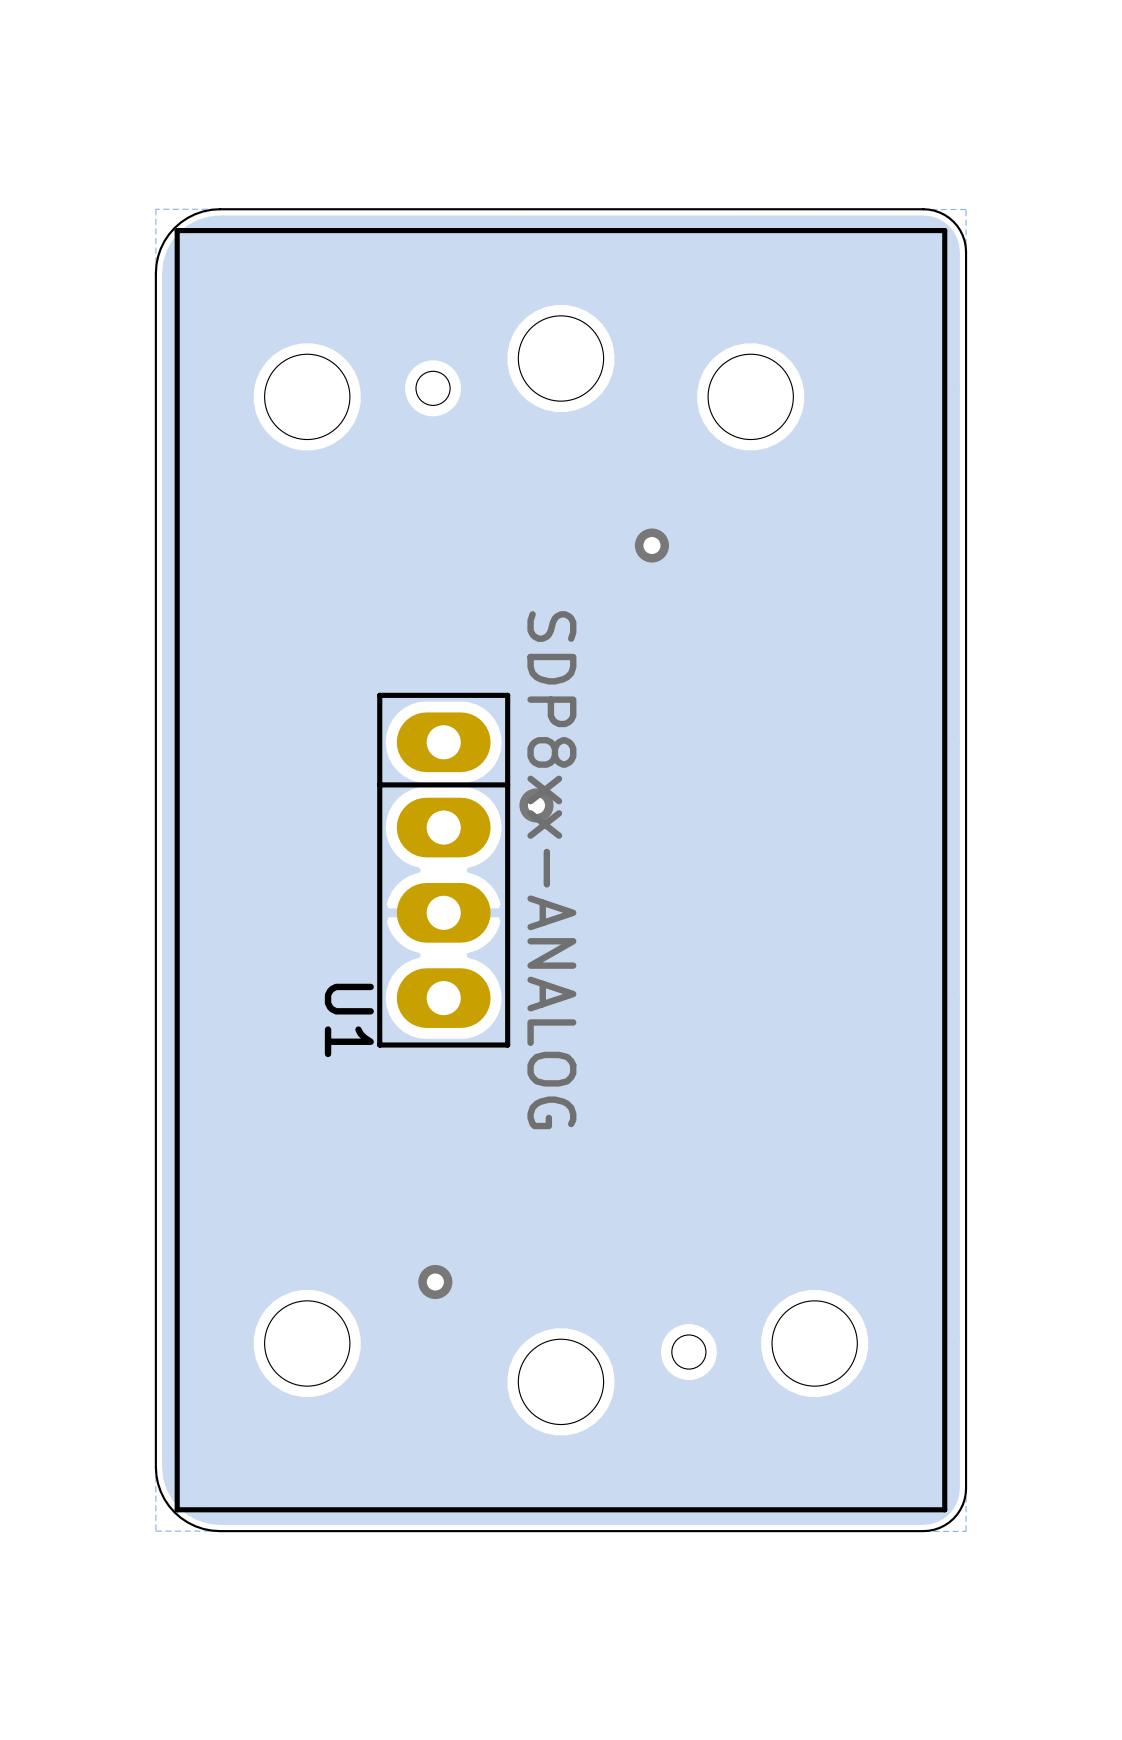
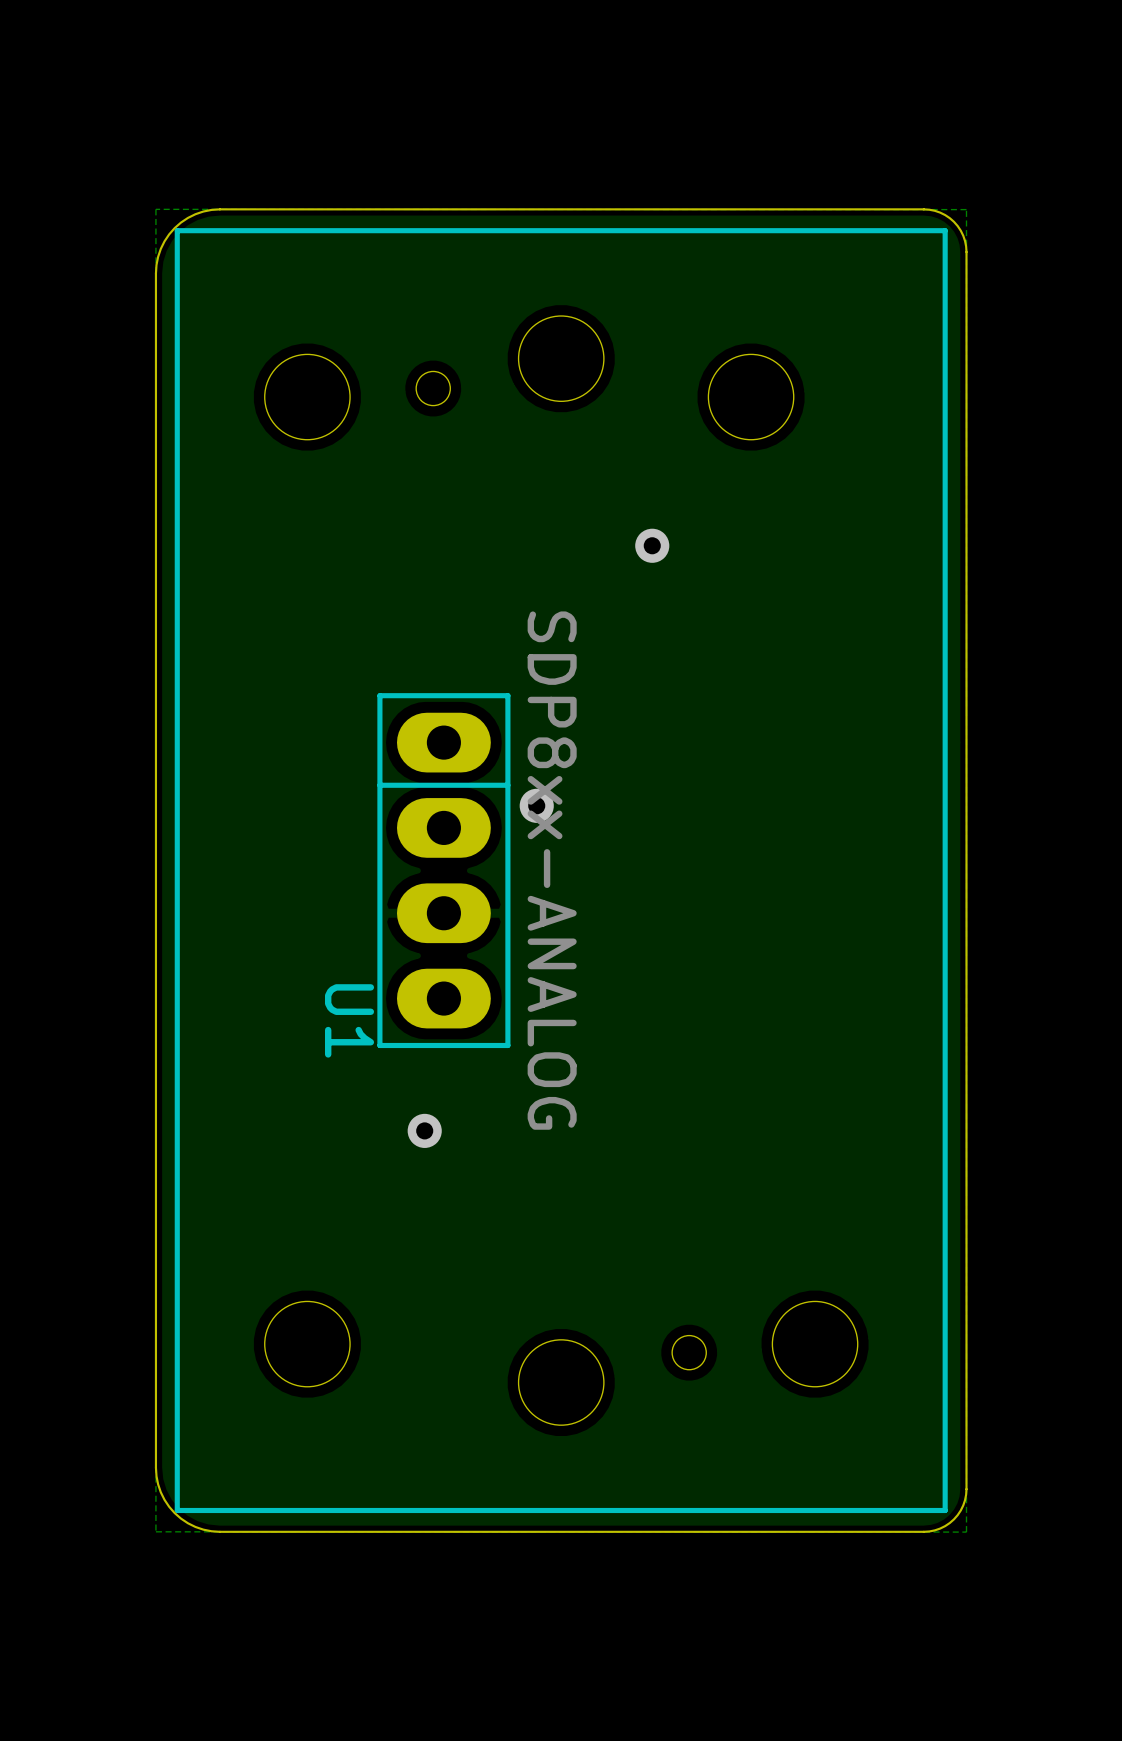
via position: (435, 1282) -> (424, 1130)

